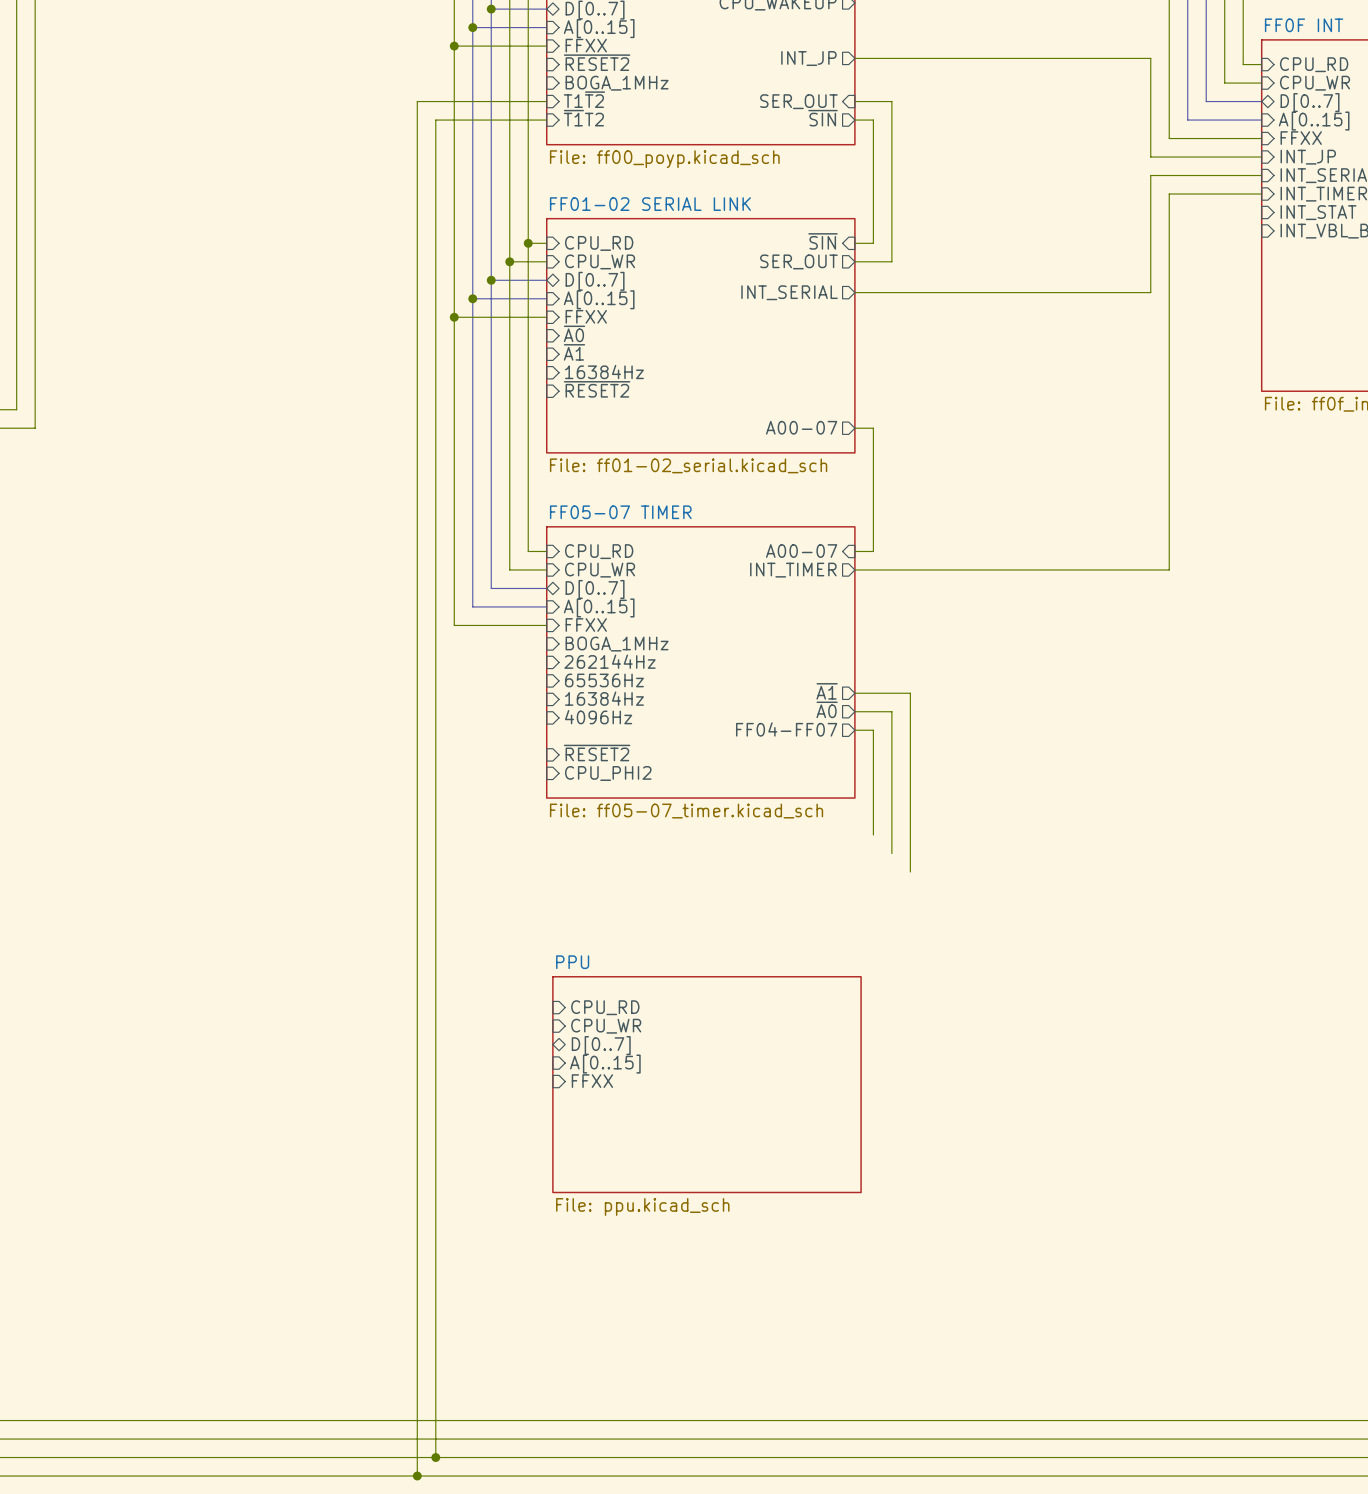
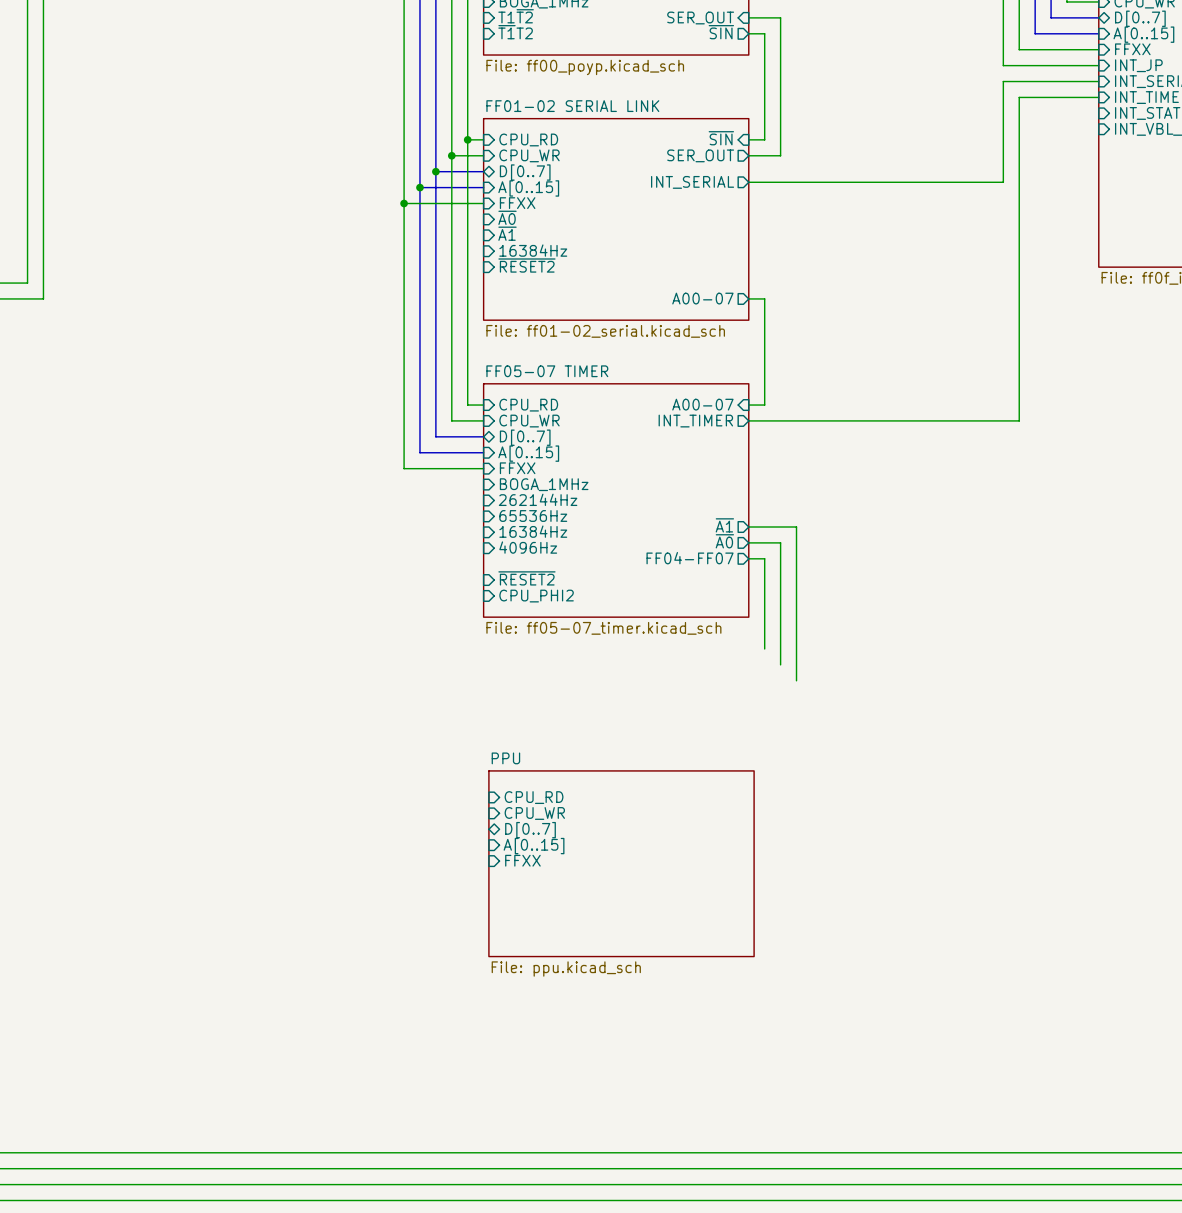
wire: (546, 101) (417, 101) (417, 1476) -> none
wire: (546, 120) (435, 120) (435, 1457) -> none
junction: (435, 1457) -> none
junction: (417, 1476) -> none

